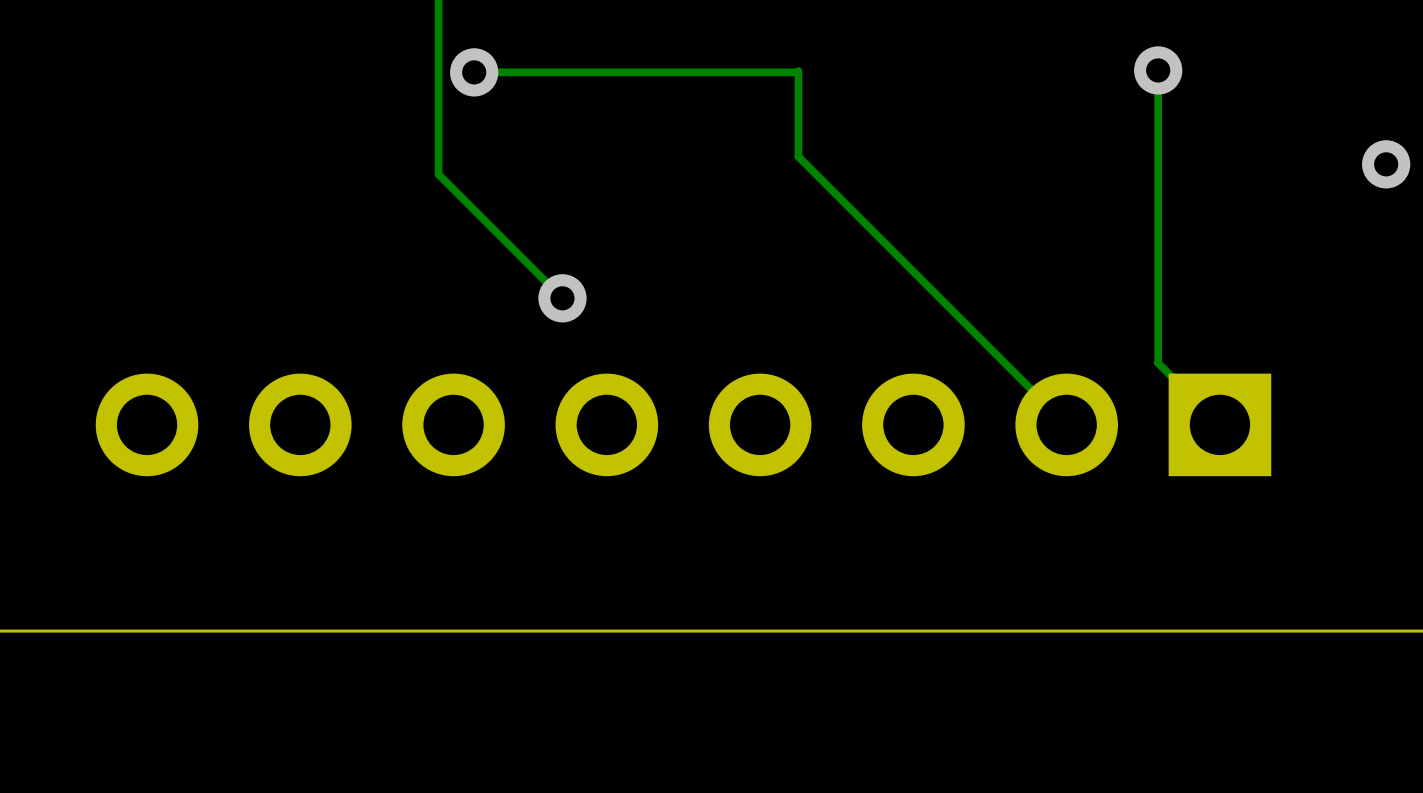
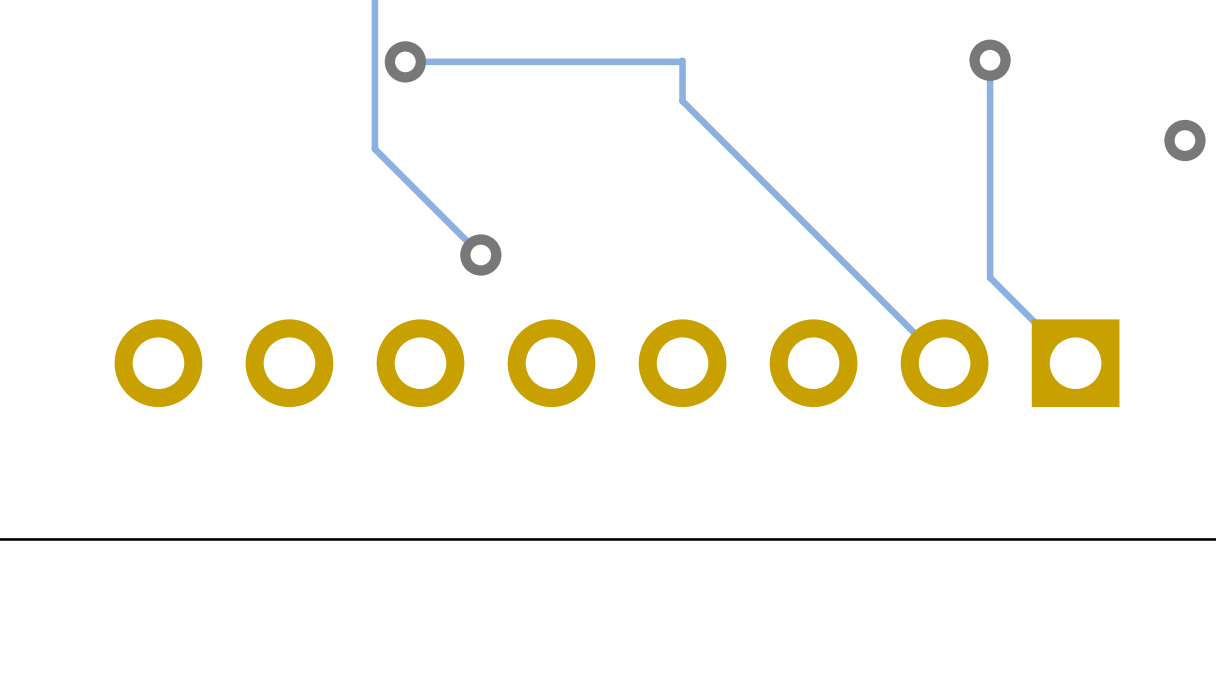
track: (798, 118) (798, 156) (1066, 424) -> (682, 101) (944, 363)
track: (1158, 324) (1158, 363) (1219, 424) -> (990, 277) (1075, 363)
part position: (683, 424) -> (617, 363)

